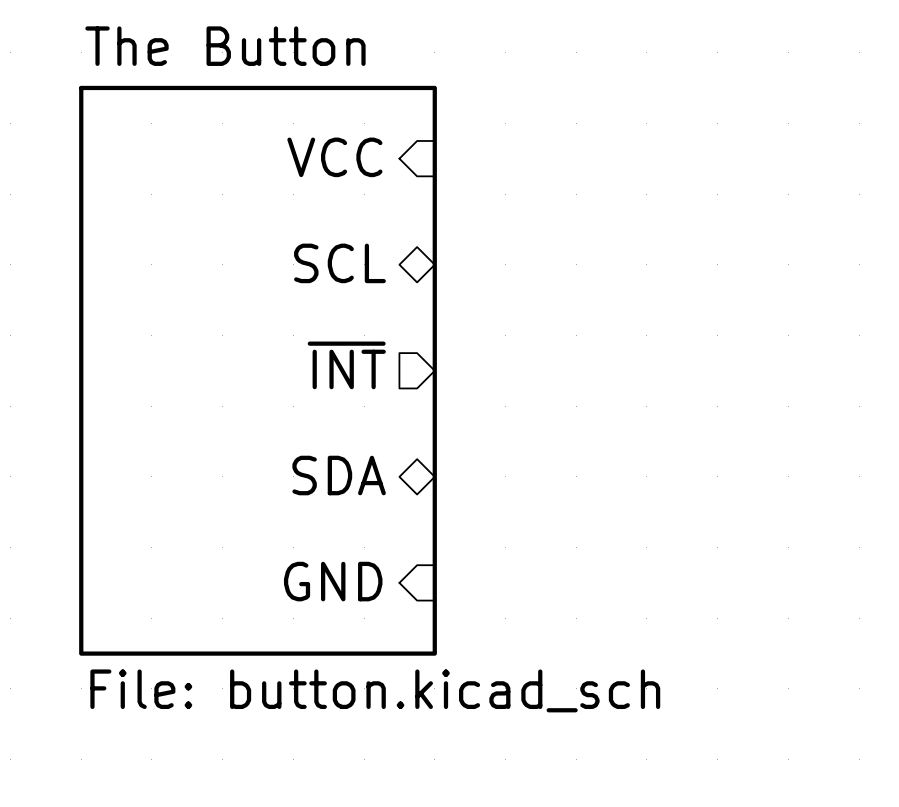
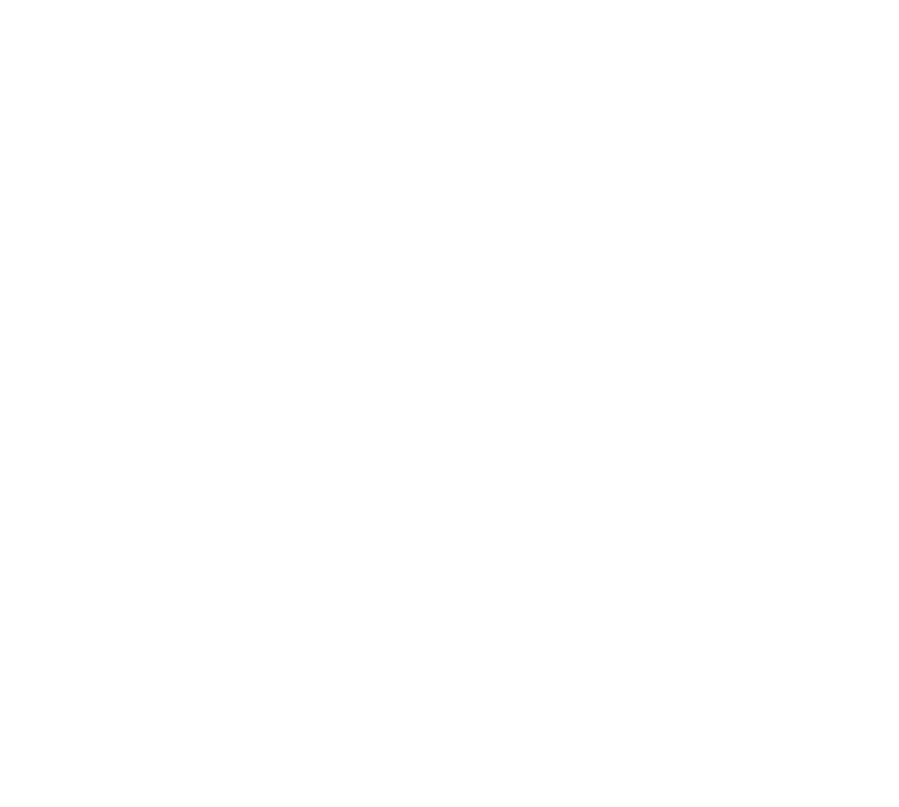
sheet pin: VCC (334, 157) -> none
sheet pin: SCL (339, 263) -> none
sheet pin: ~{INT} (346, 365) -> none
sheet The Button: File: button.kicad_sch (258, 370) -> none
sheet pin: SDA (339, 475) -> none
sheet pin: GND (333, 581) -> none

